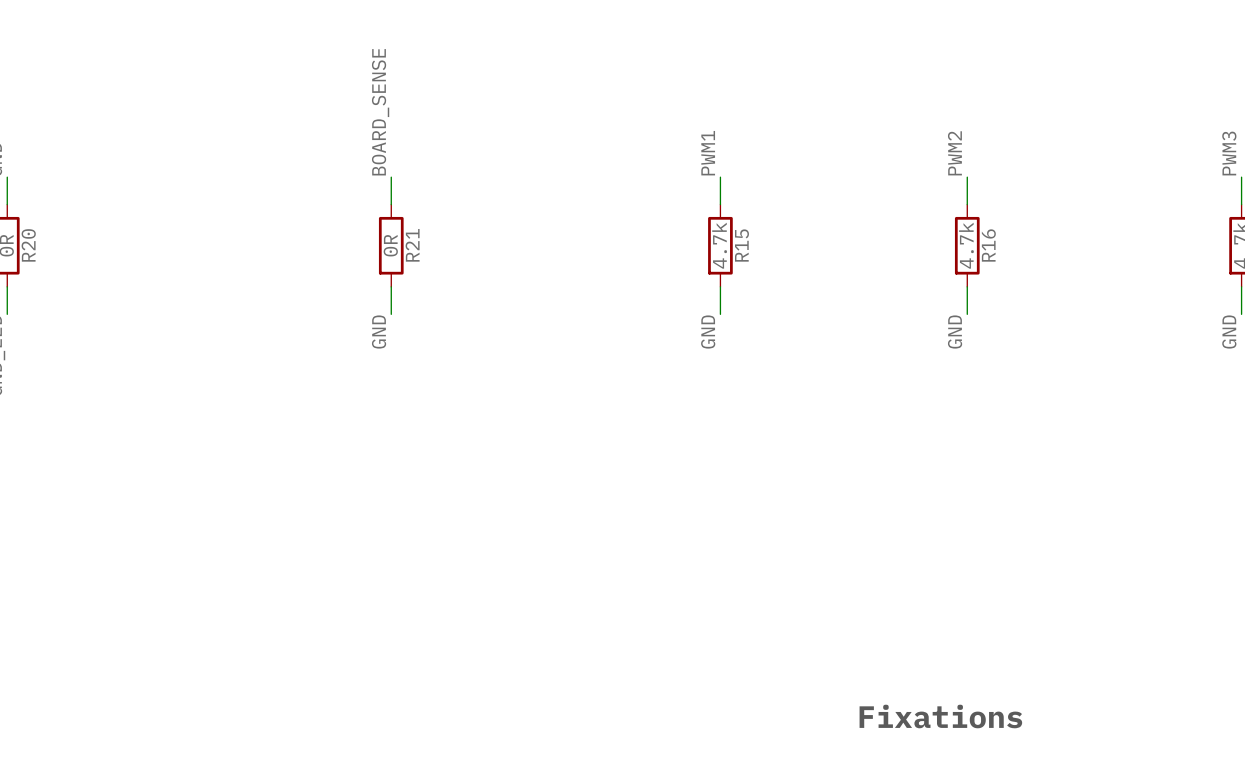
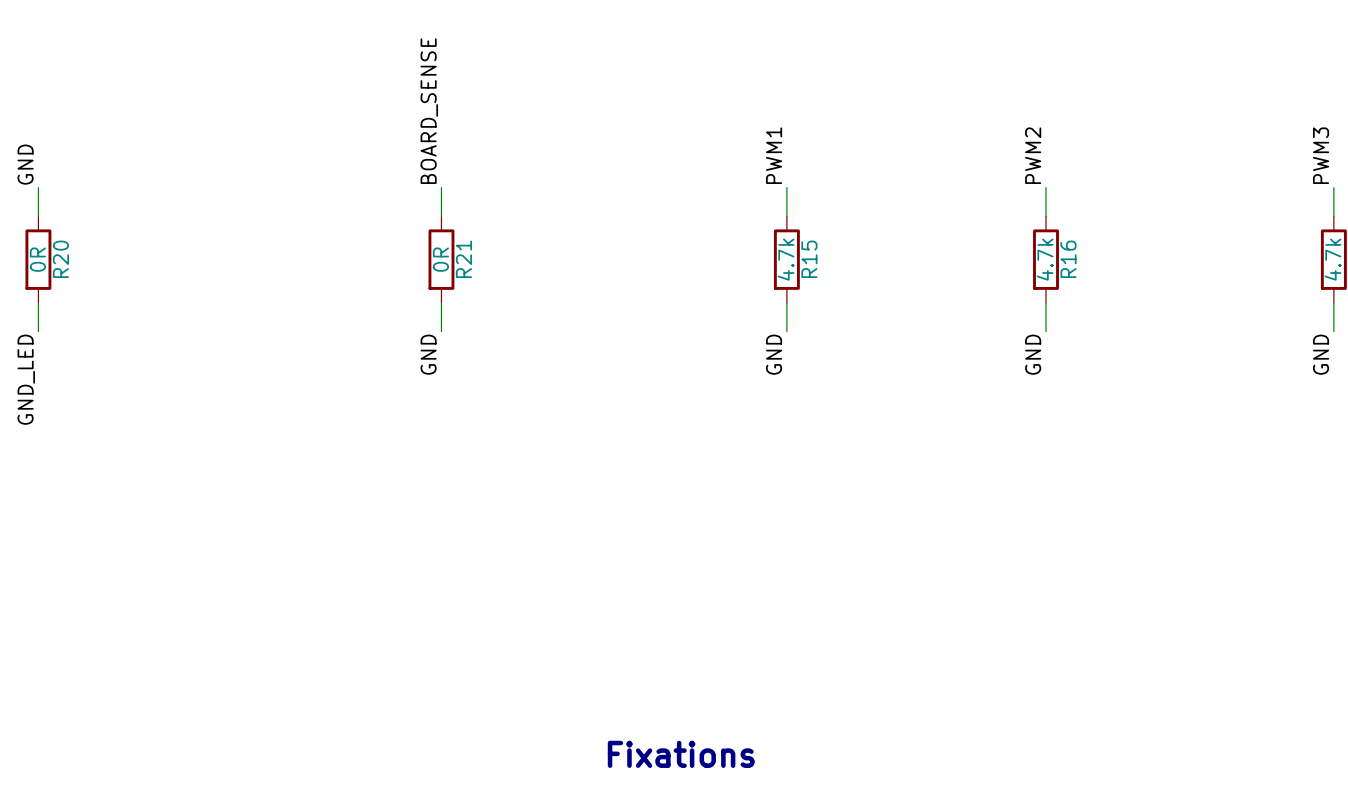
text: none -> Fixations (681, 754)
text: Fixations (940, 716) -> none

